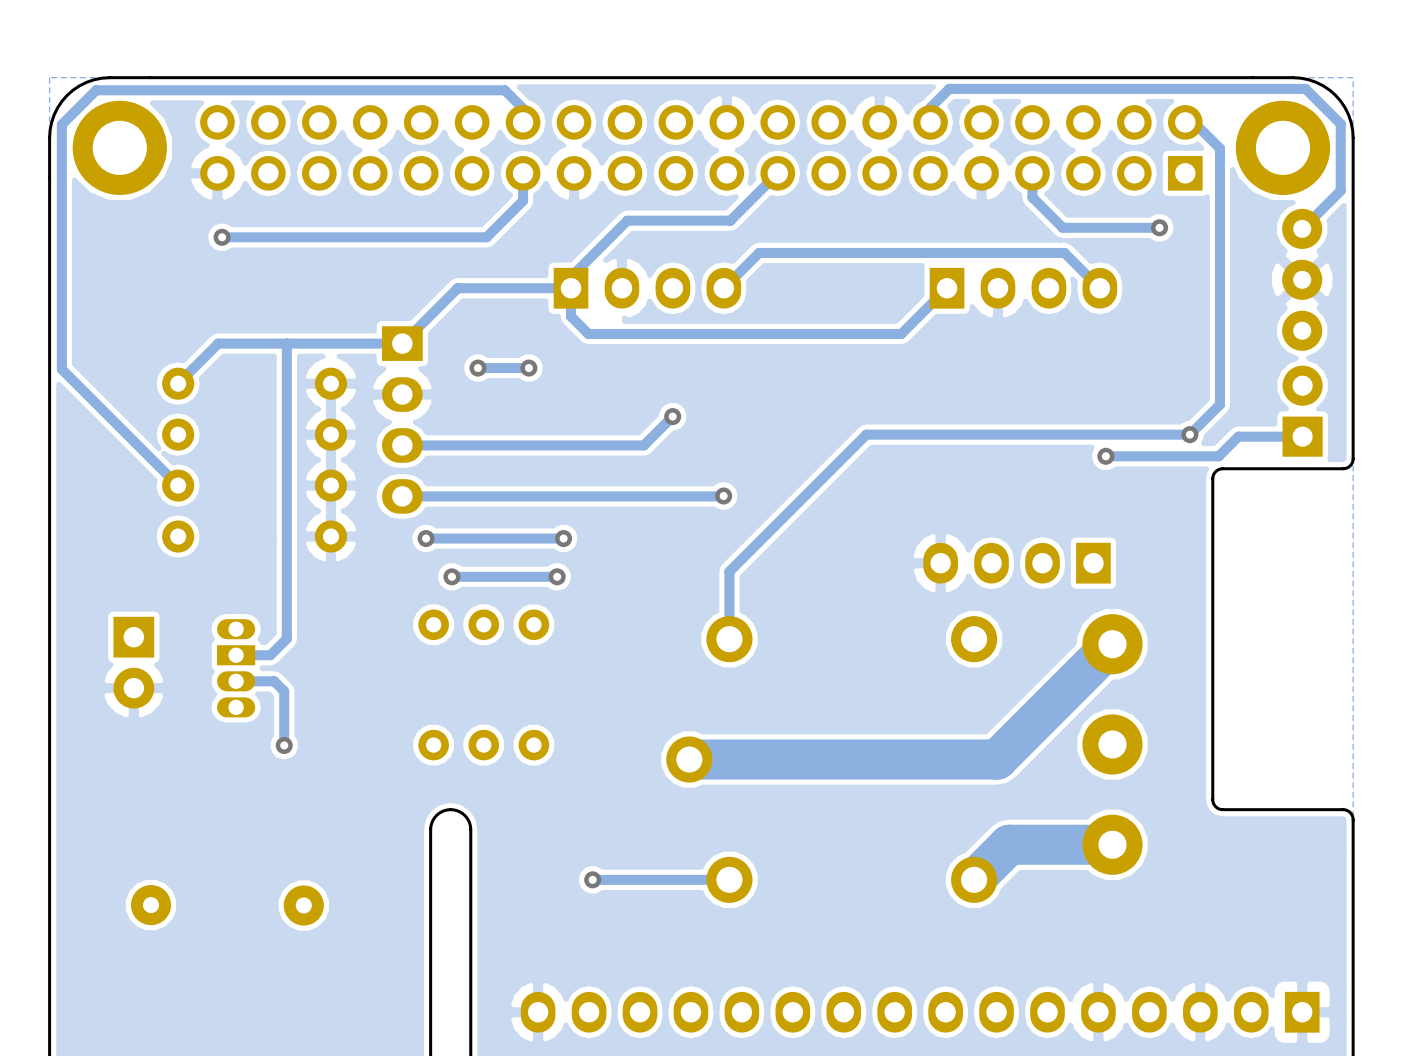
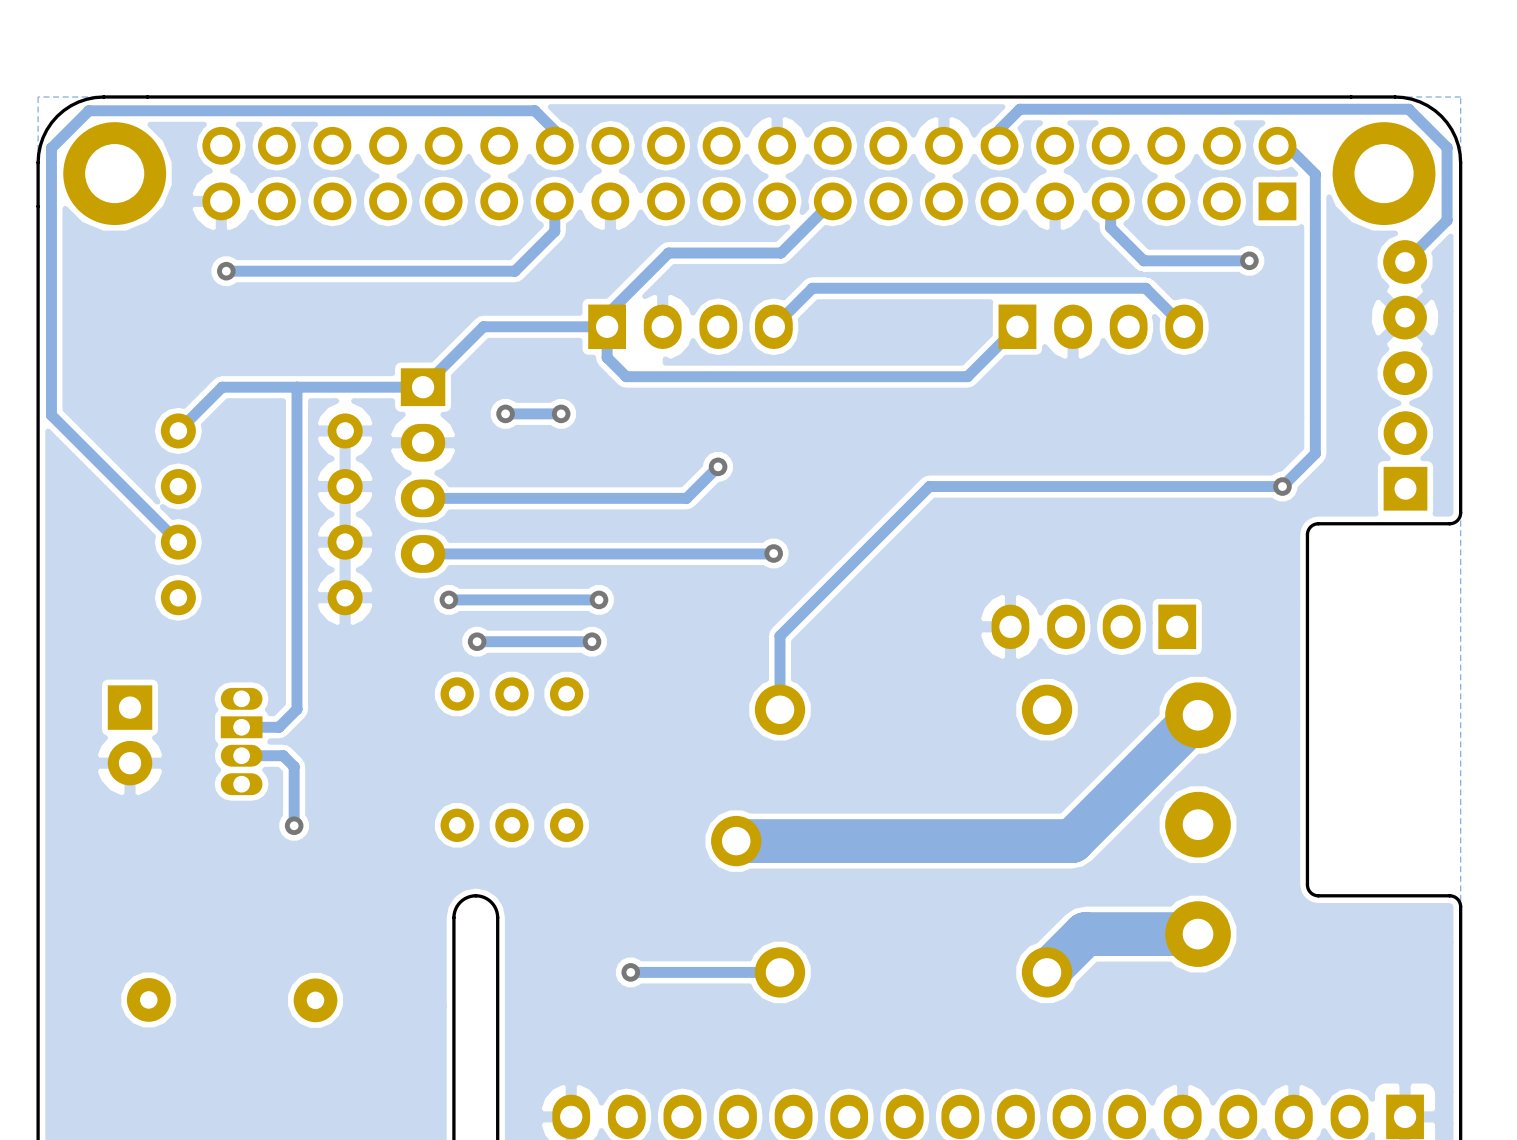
track: (1302, 436) (1238, 436) (1218, 456) (1105, 456) -> none
via: (1105, 456) -> none

